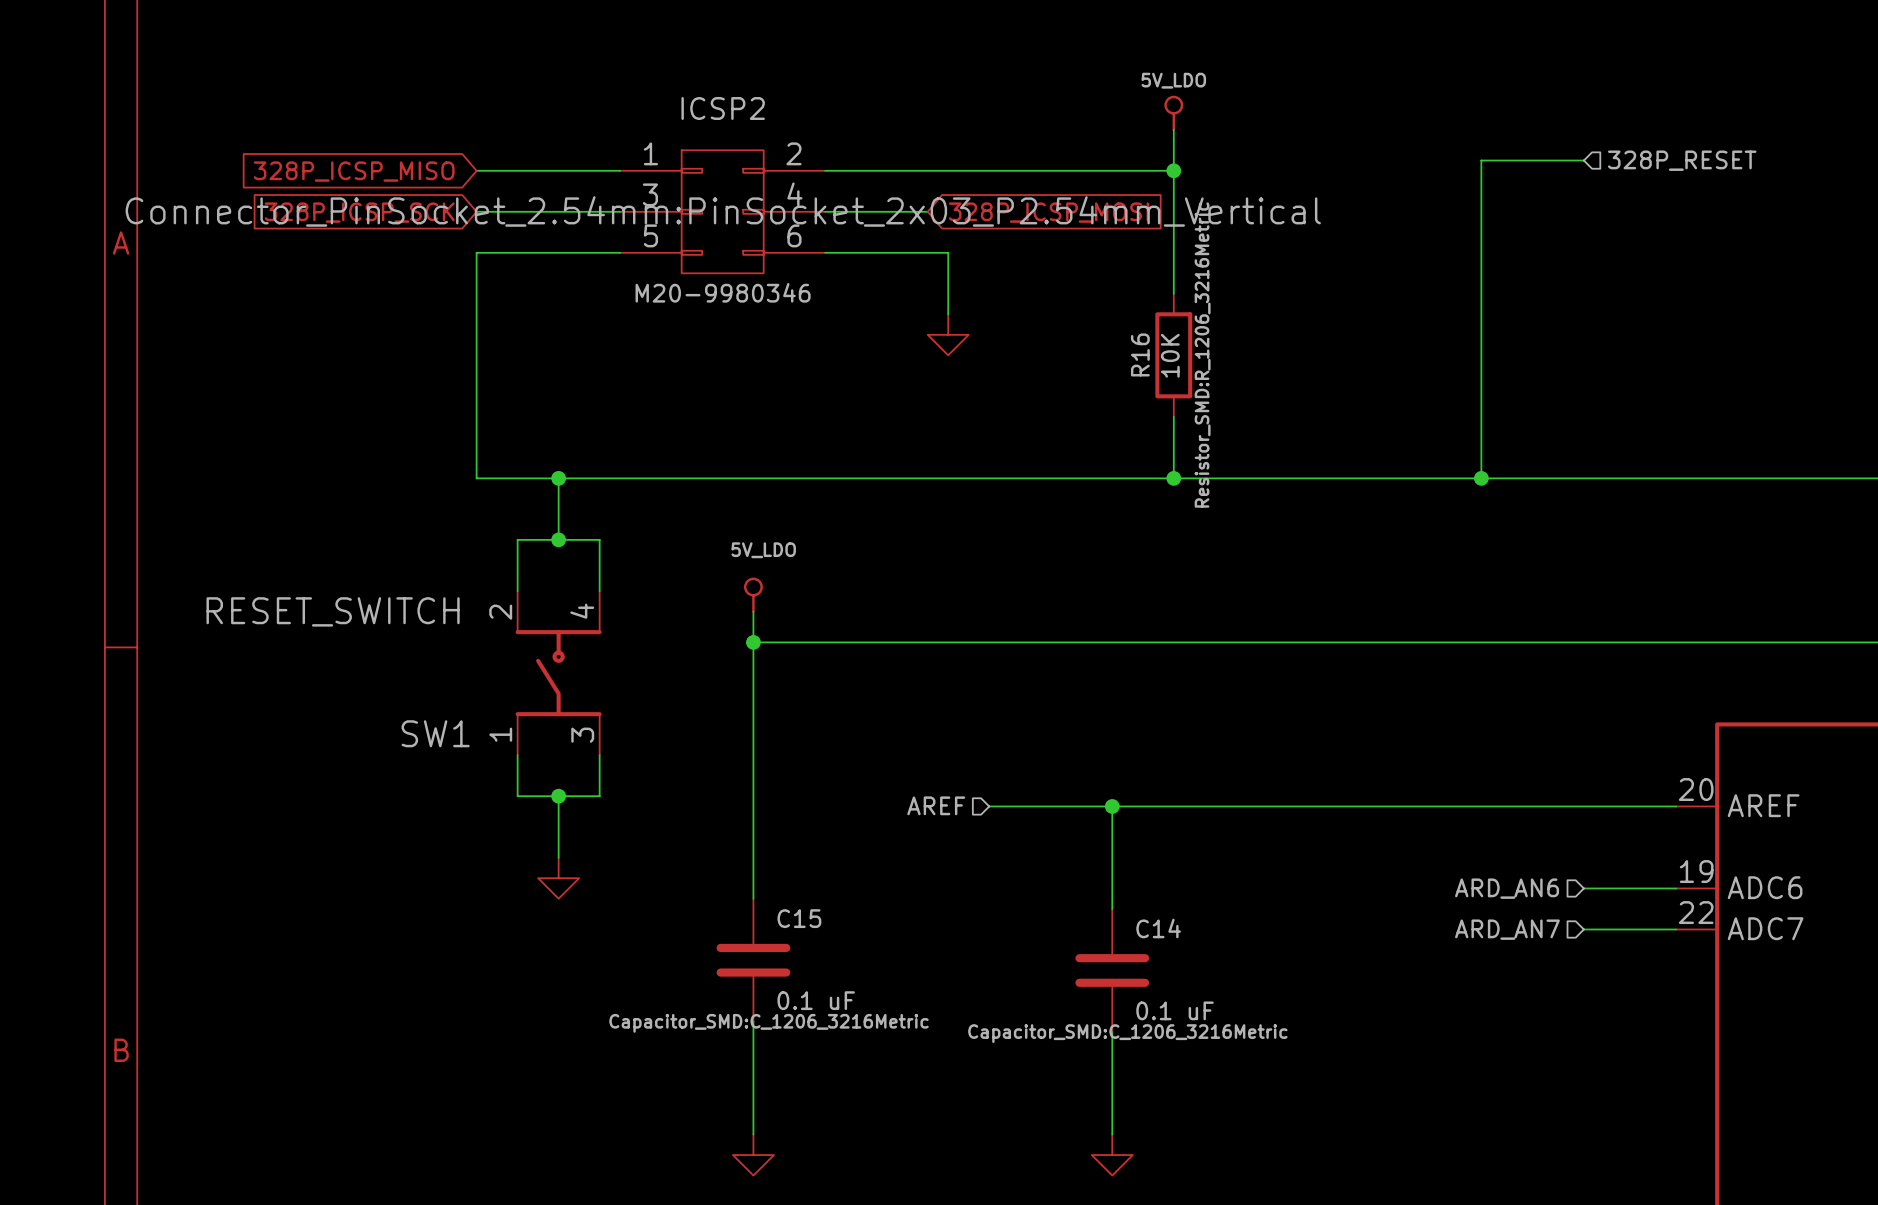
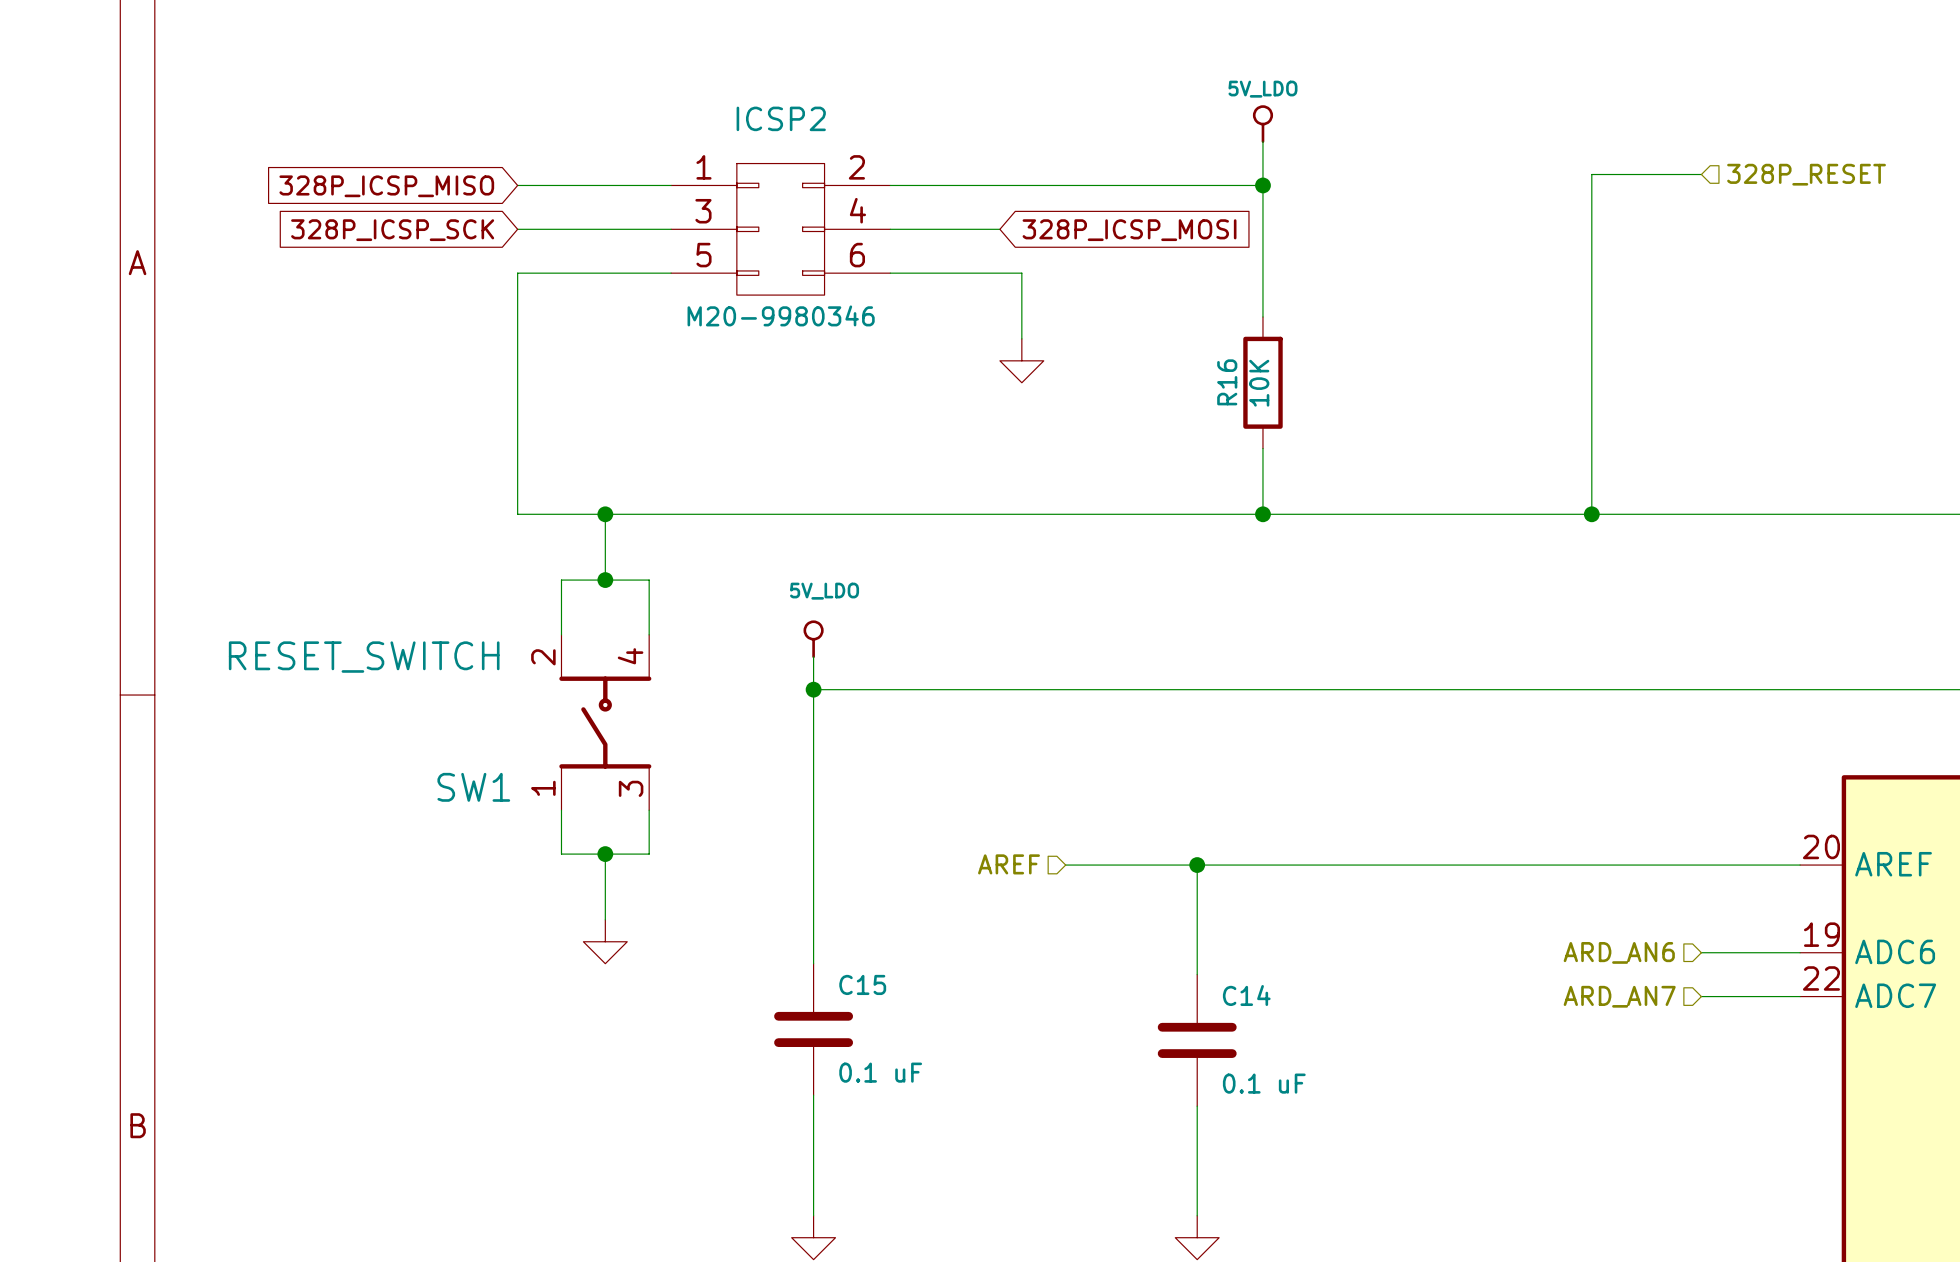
ICSP2 text: Connector_PinSocket_2.54mm:PinSocket_2x03_P2.54mm_Vertical (723, 211) -> none
R16 text: Resistor_SMD:R_1206_3216Metric (1202, 355) -> none
C15 text: Capacitor_SMD:C_1206_3216Metric (769, 1023) -> none
C14 text: Capacitor_SMD:C_1206_3216Metric (1127, 1033) -> none

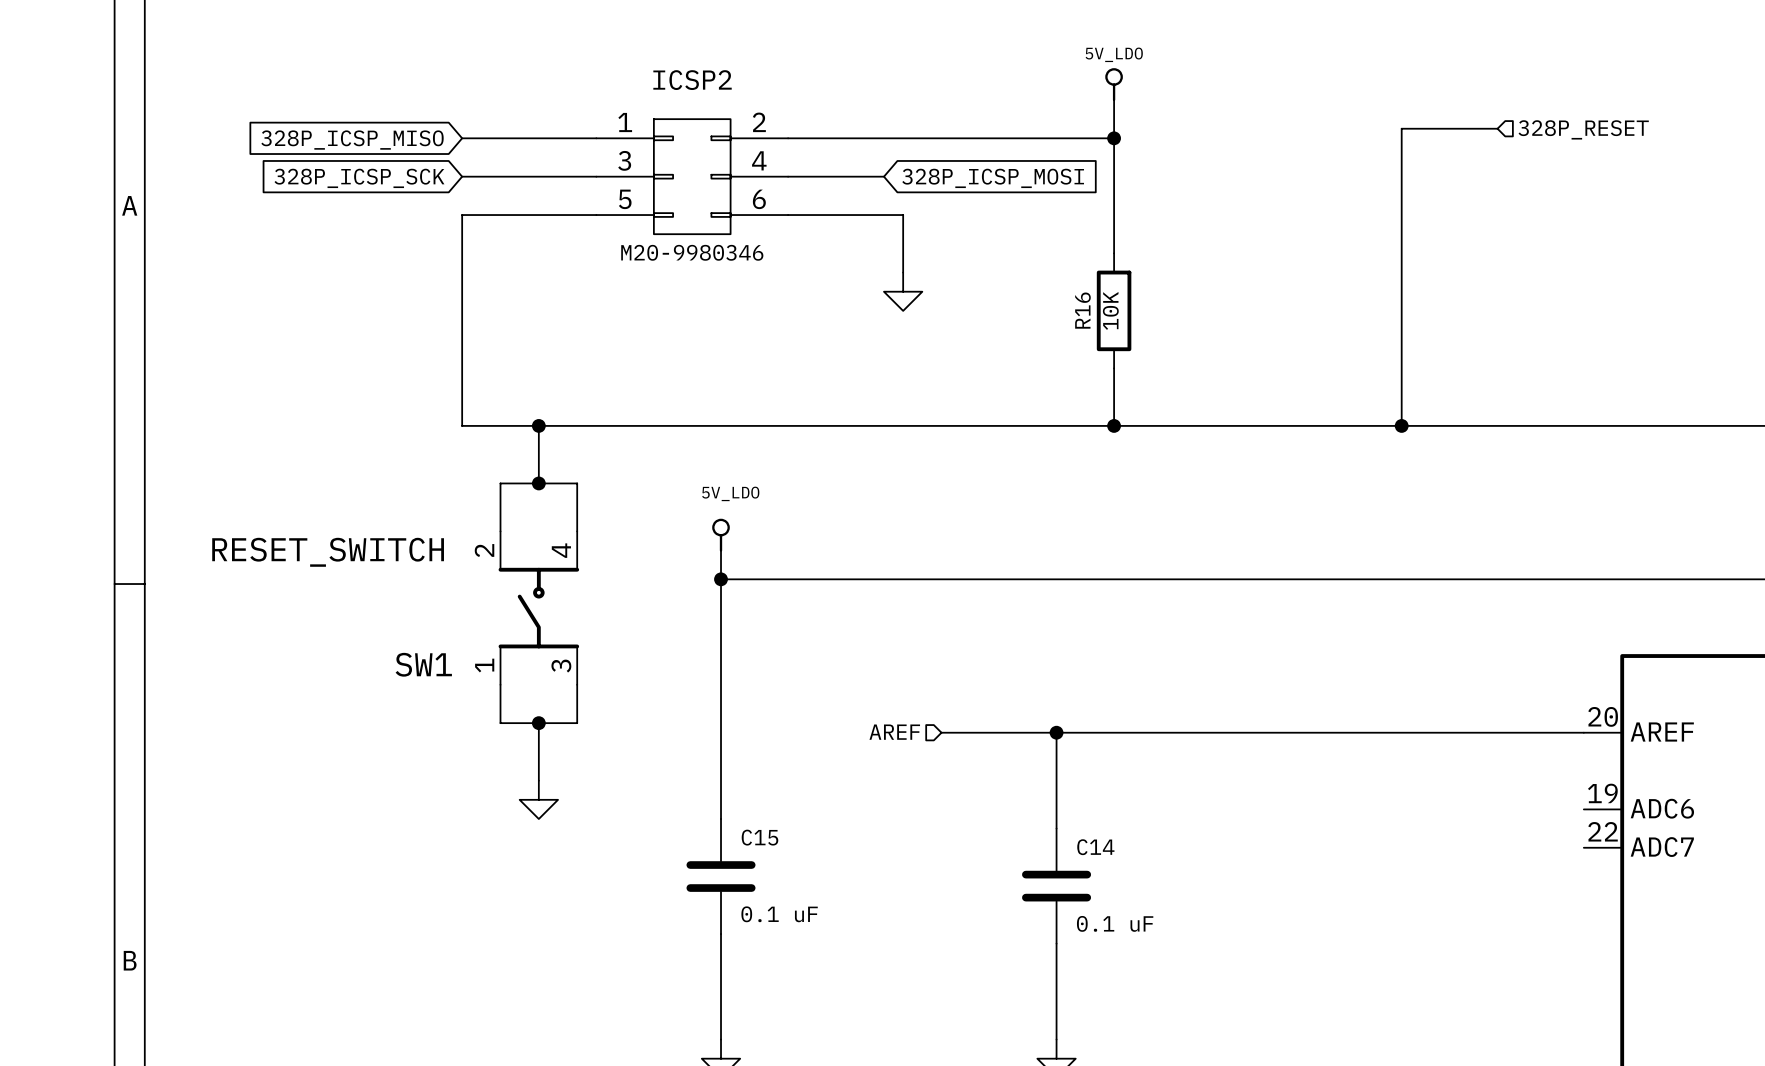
hierarchical label: ARD_AN6 (1619, 952) -> none
wire: (1701, 952) (1800, 952) -> none
hierarchical label: ARD_AN7 (1619, 996) -> none
wire: (1701, 996) (1800, 996) -> none

